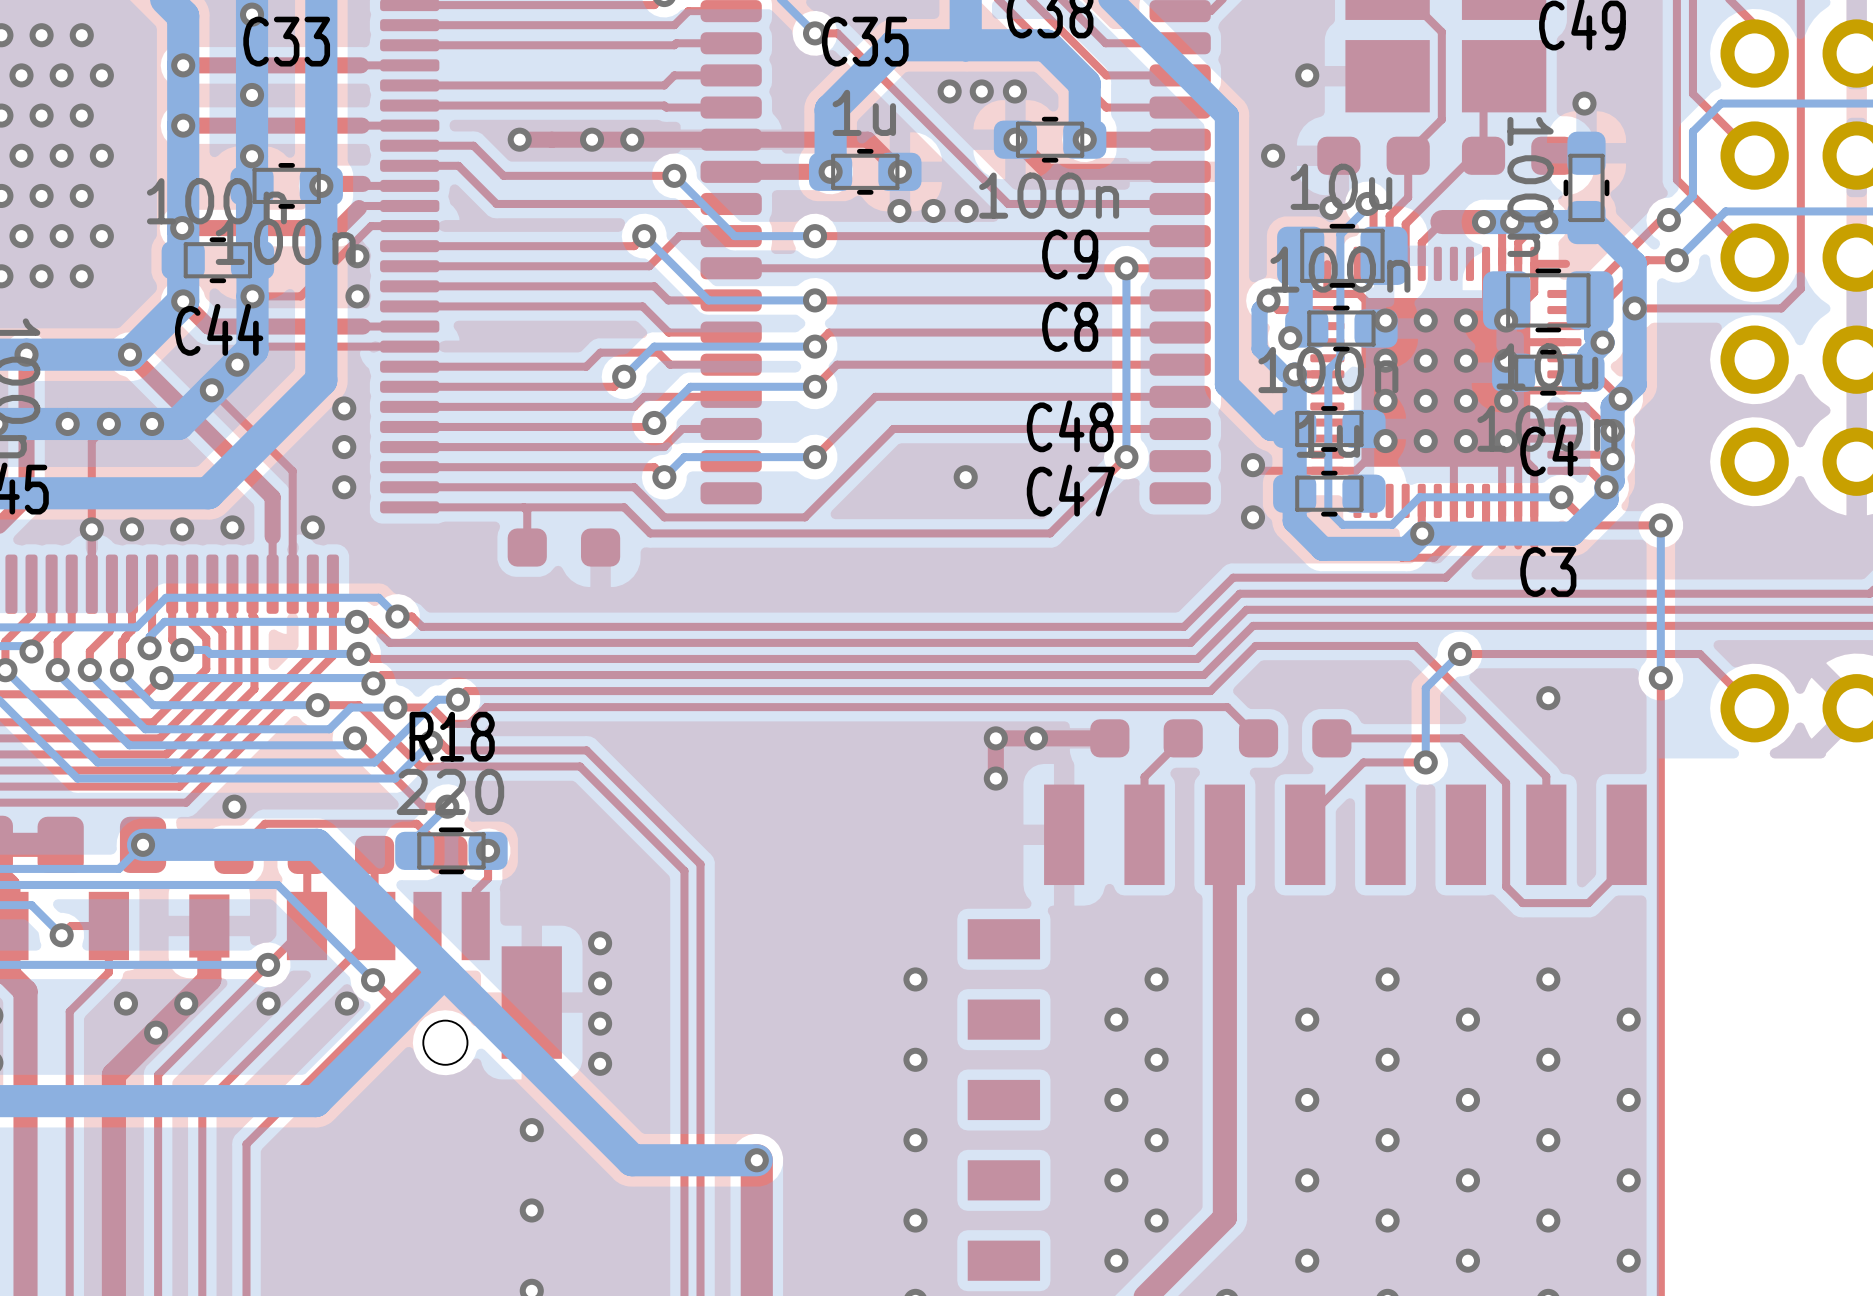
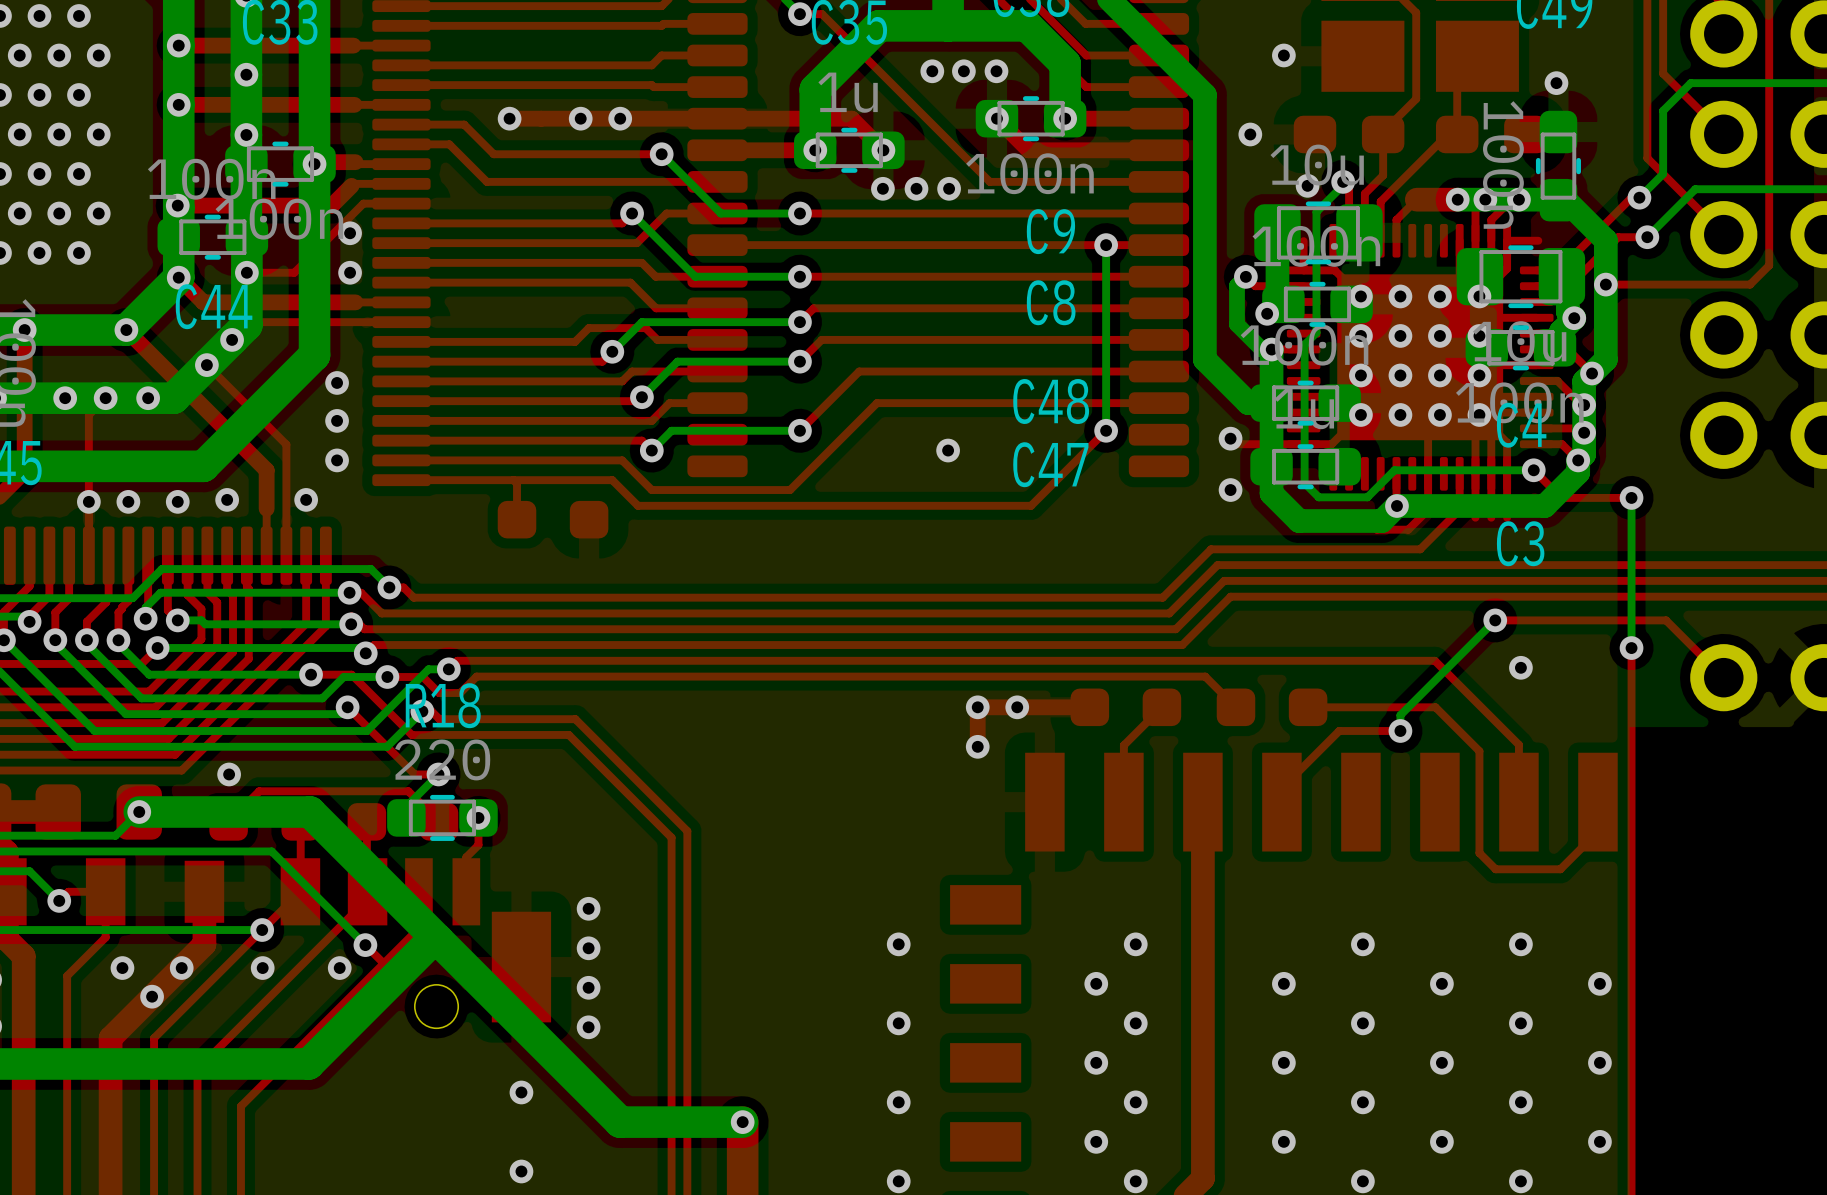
bottom track: (1459, 653) (1425, 688) (1425, 746) -> (1495, 620) (1400, 715)
via position: (1459, 653) -> (1495, 620)
top track: (1700, 654) (1459, 654) -> (1670, 624) (1666, 620) (1495, 620)
top track: (1460, 691) (1415, 645) (1255, 645) (1210, 691) -> (1434, 660) (1188, 660)

